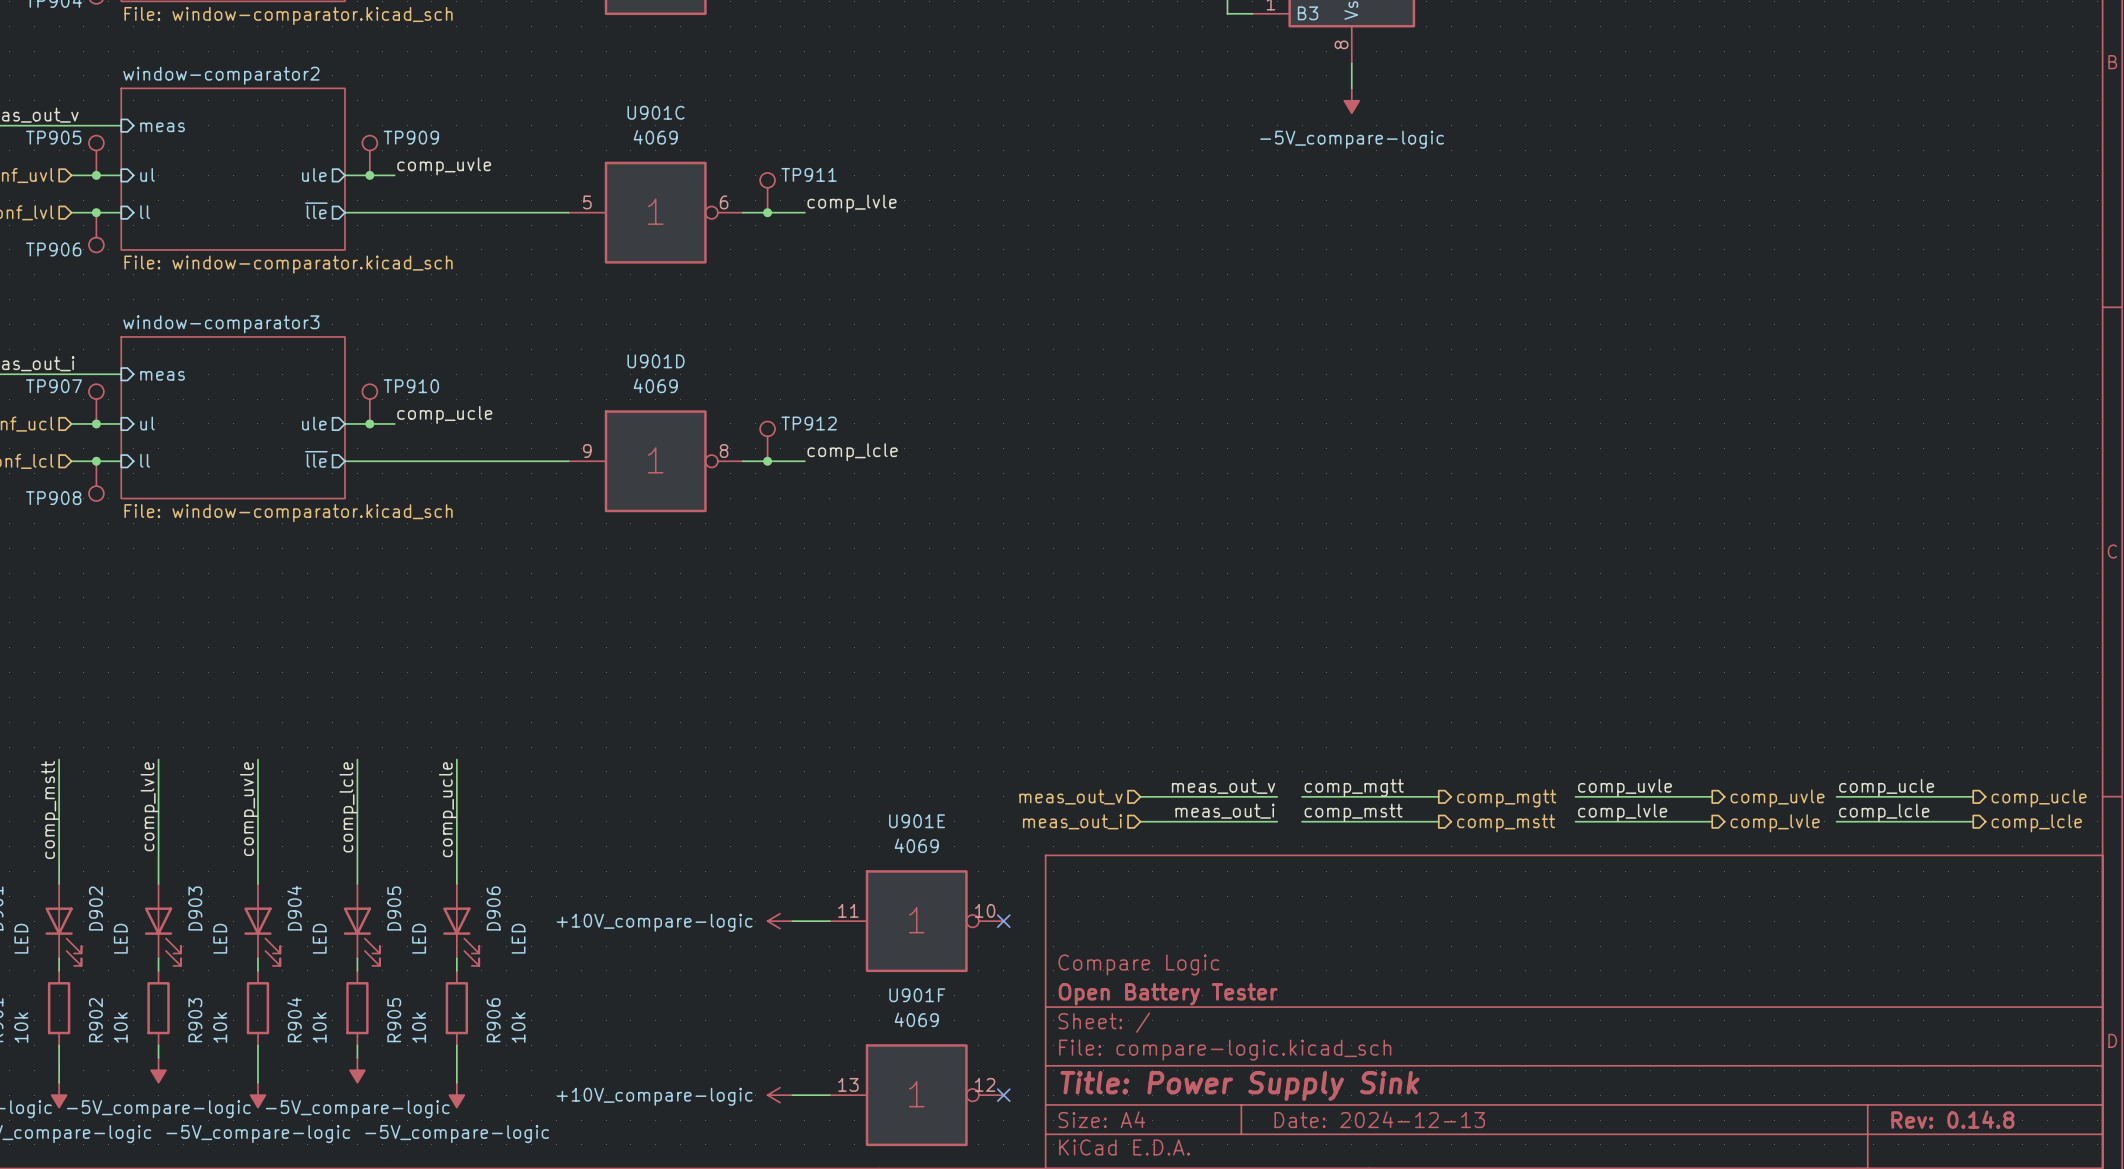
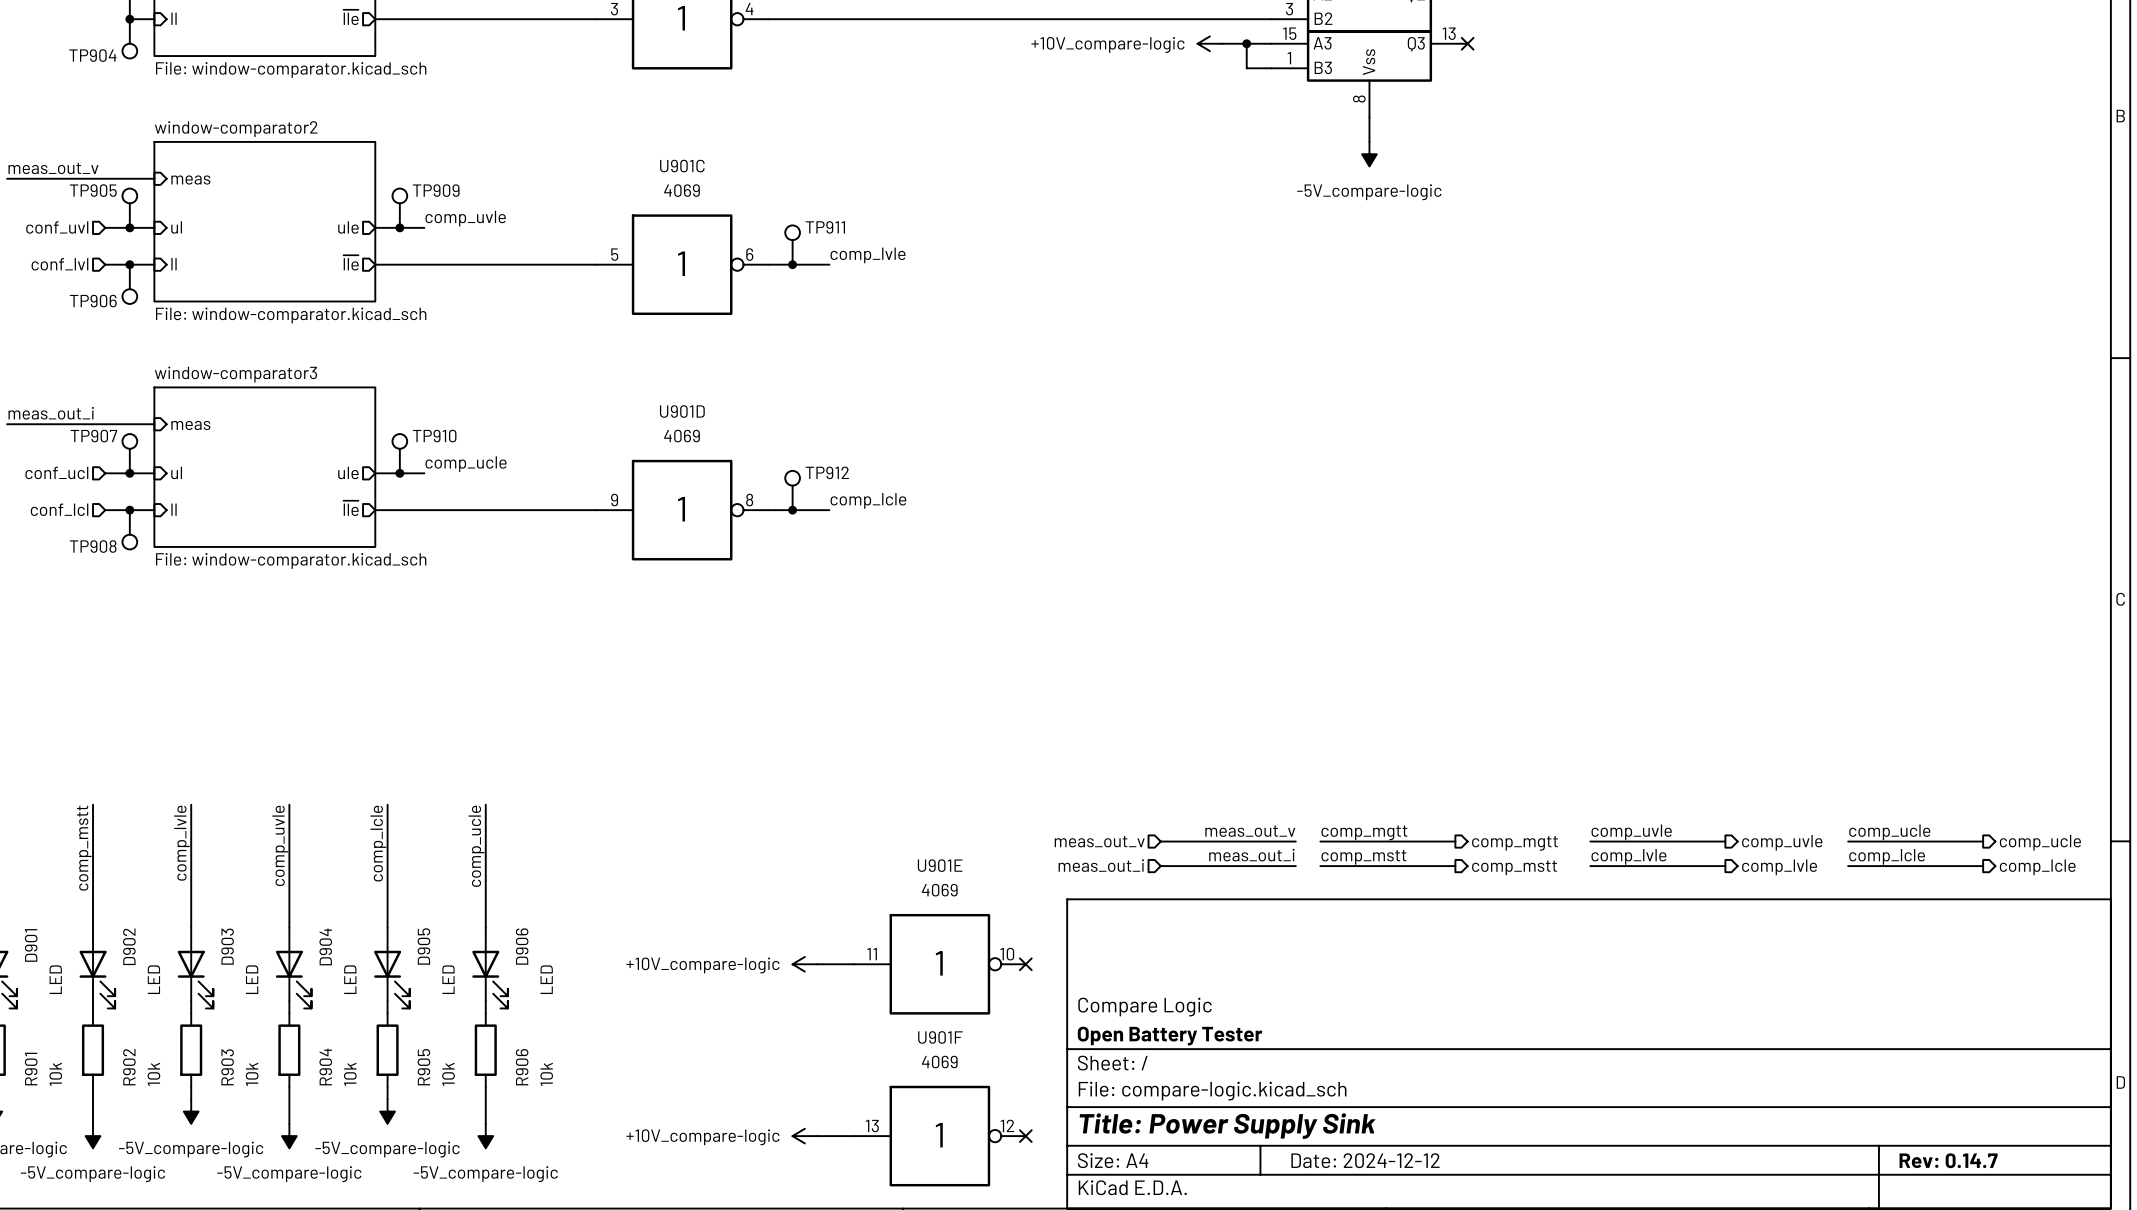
title block: Date: 2024-12-13 (1379, 1119) -> Date: 2024-12-12 (1365, 1160)
title block: Rev: 0.14.8 (1952, 1119) -> Rev: 0.14.7 (1948, 1160)

